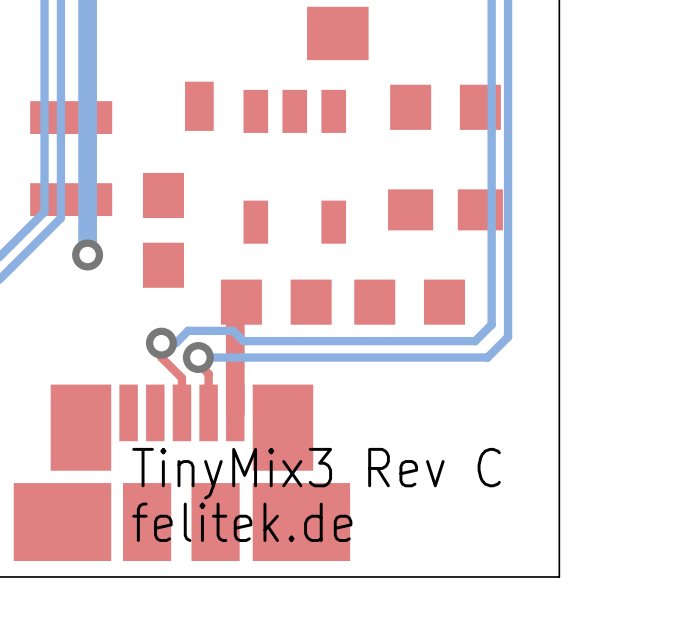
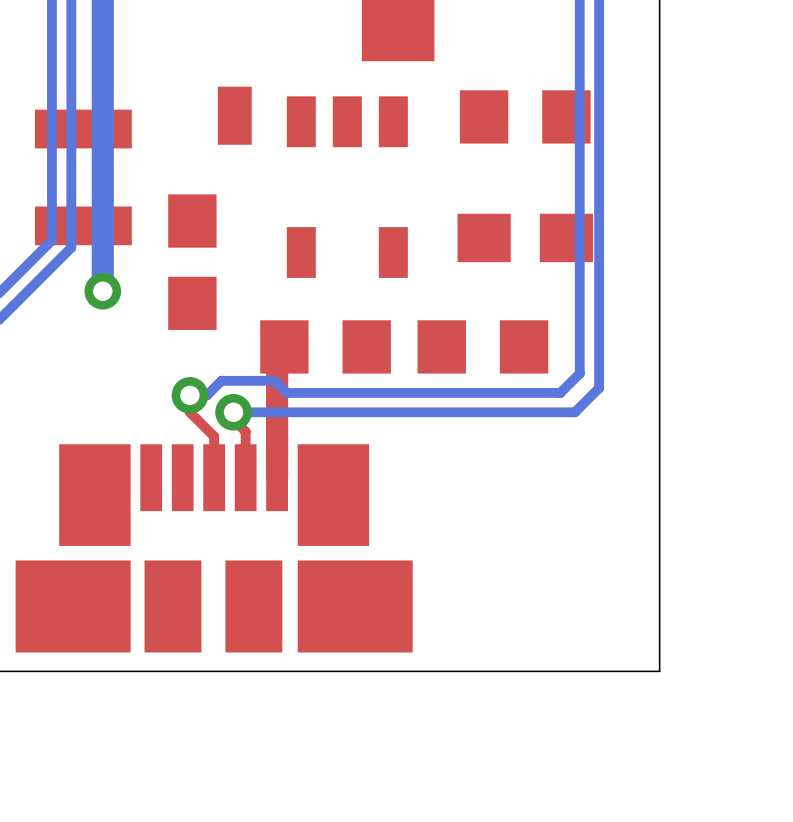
text: TinyMix3 Rev C (316, 473) -> none
text: felitek.de (242, 522) -> none

